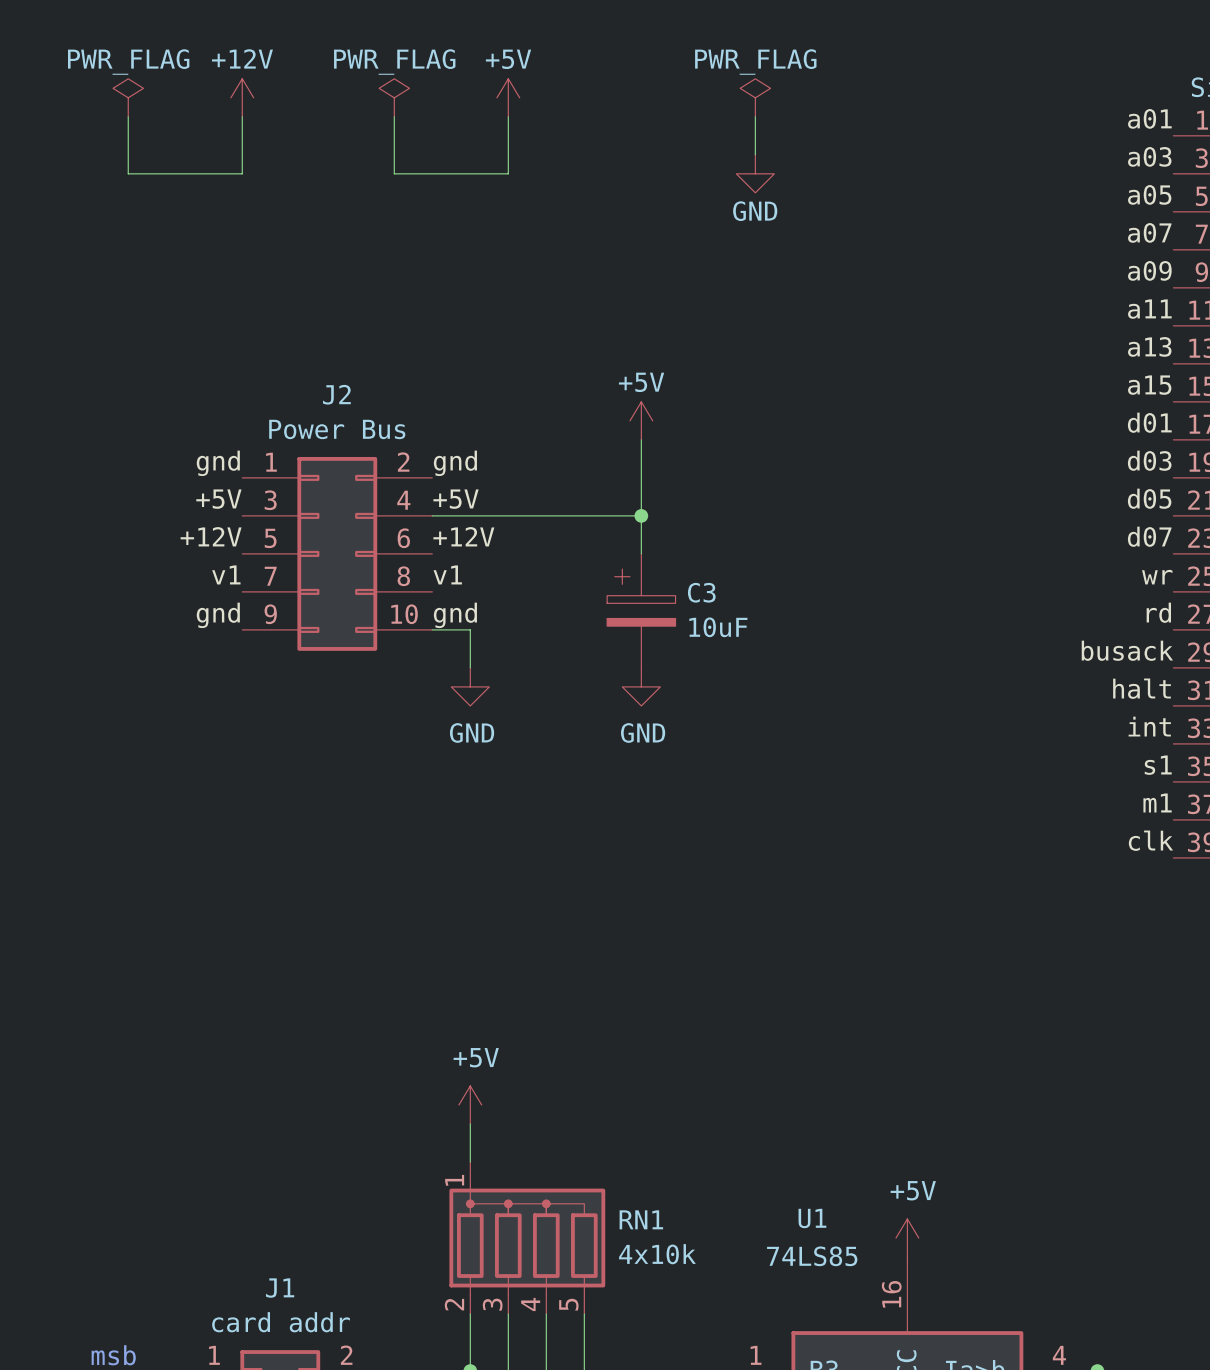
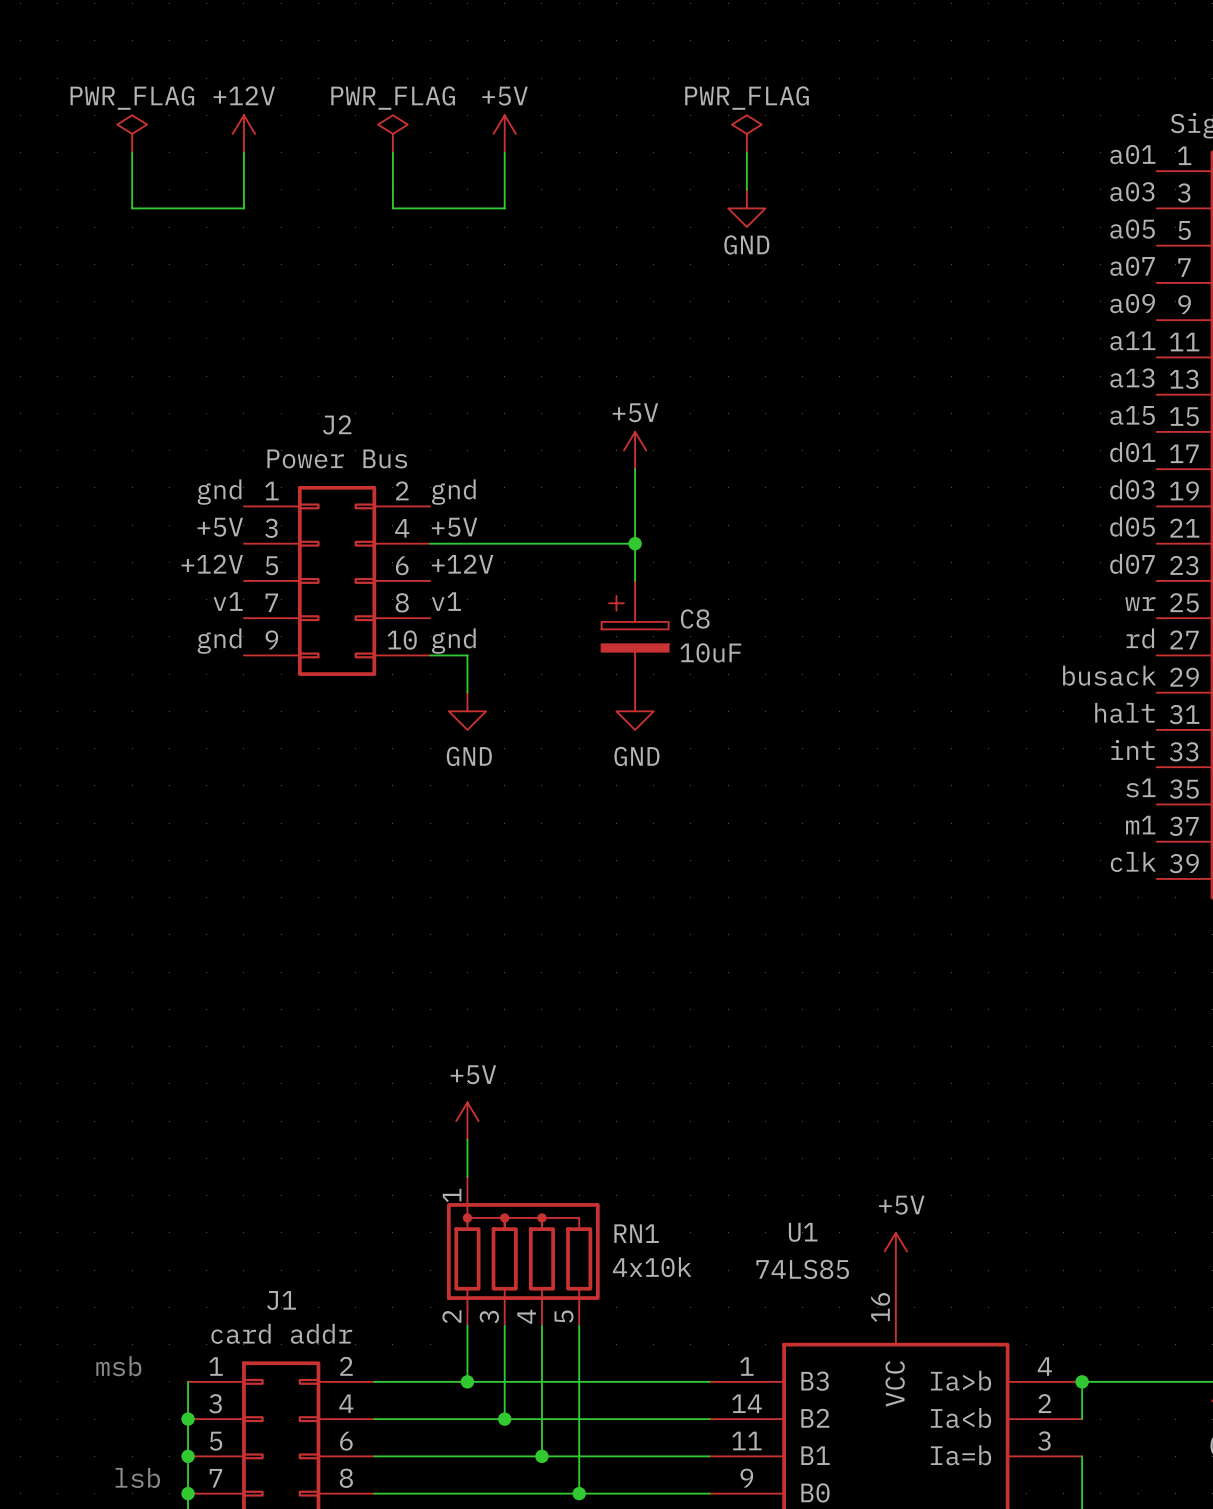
C3 name: C3 (701, 592) -> C8 (695, 618)

